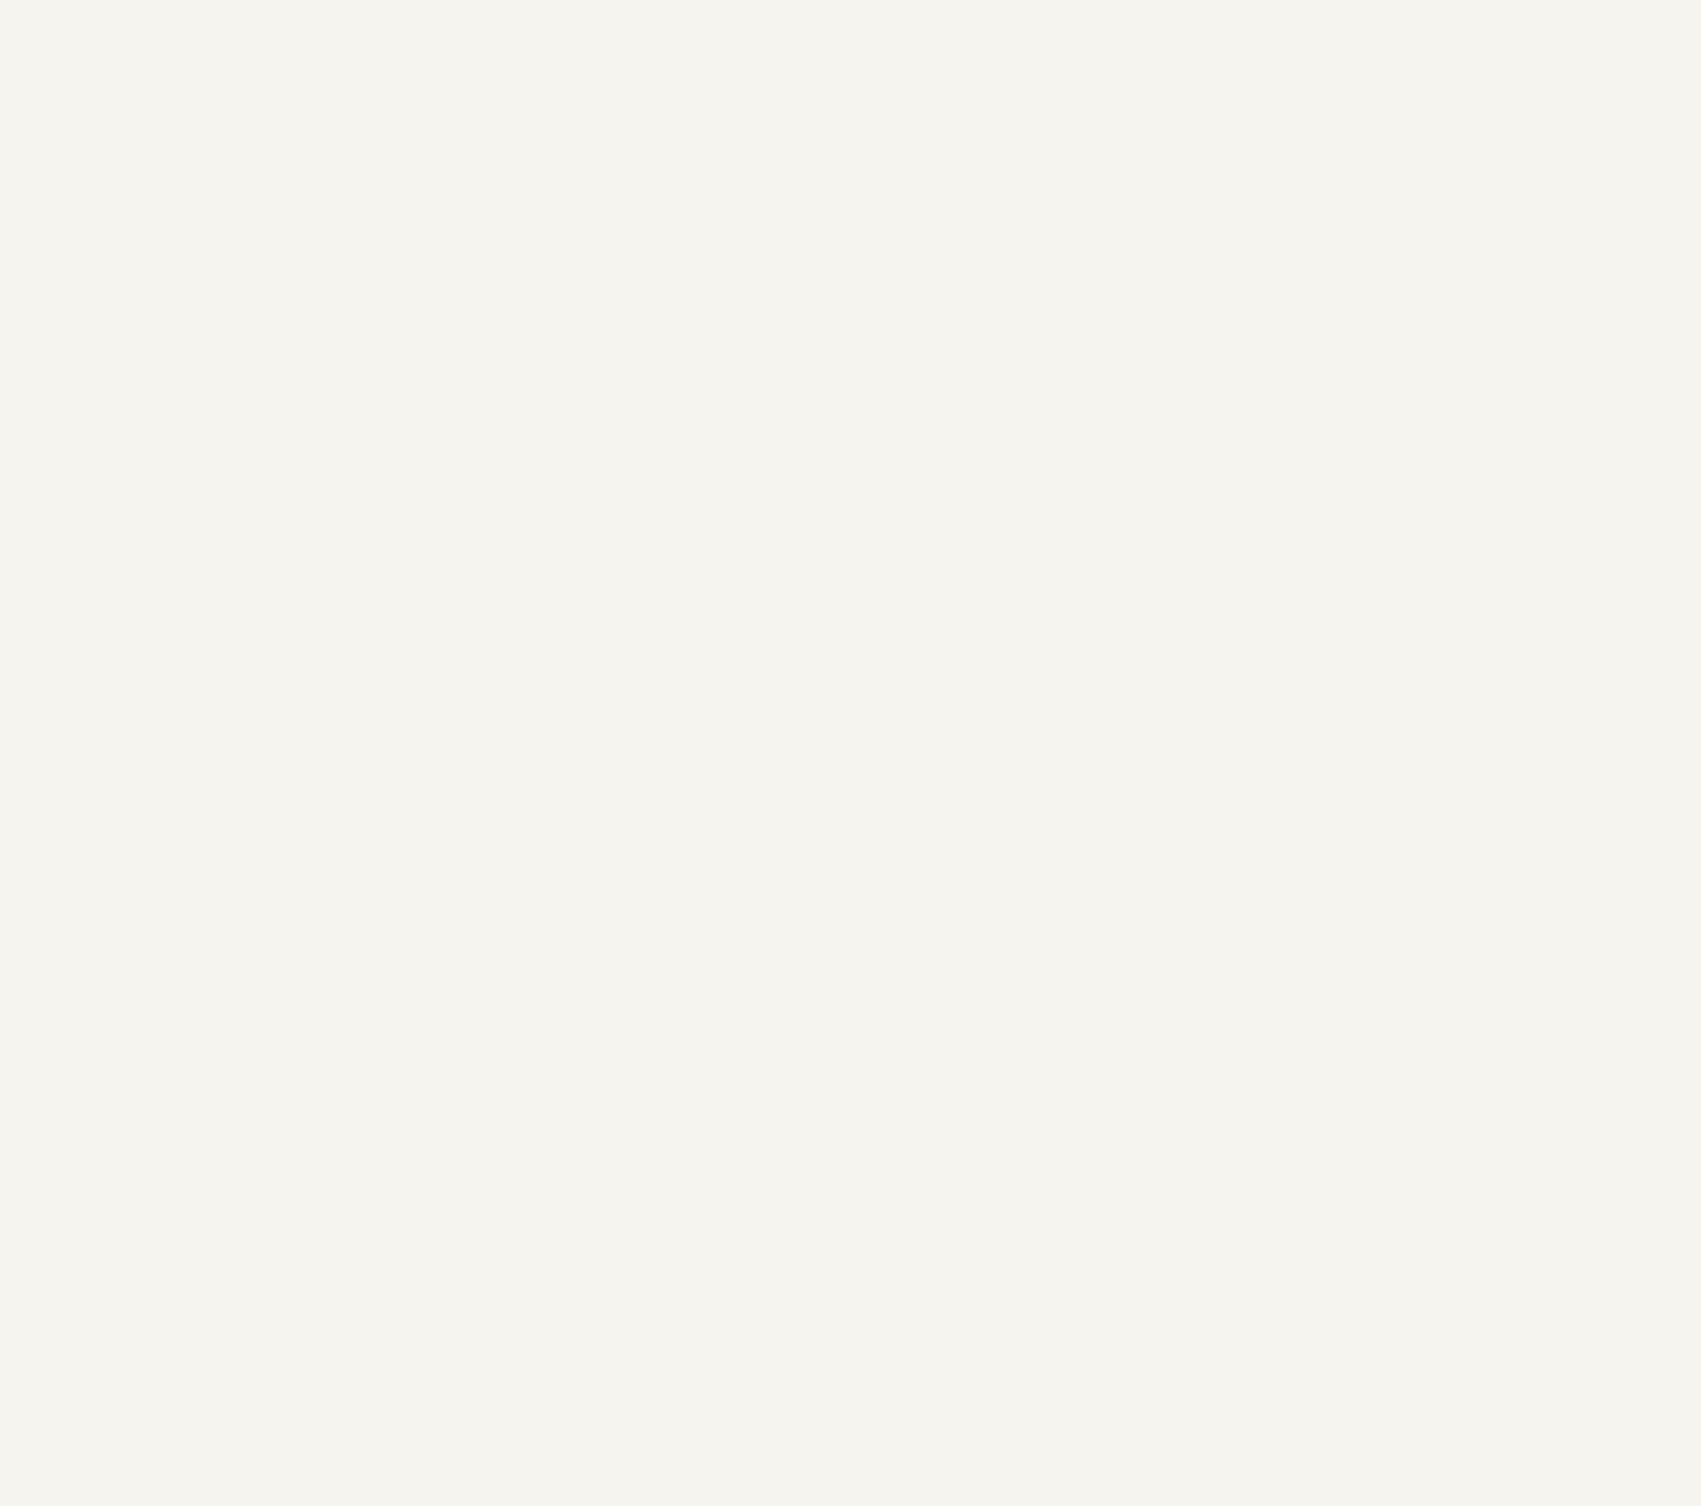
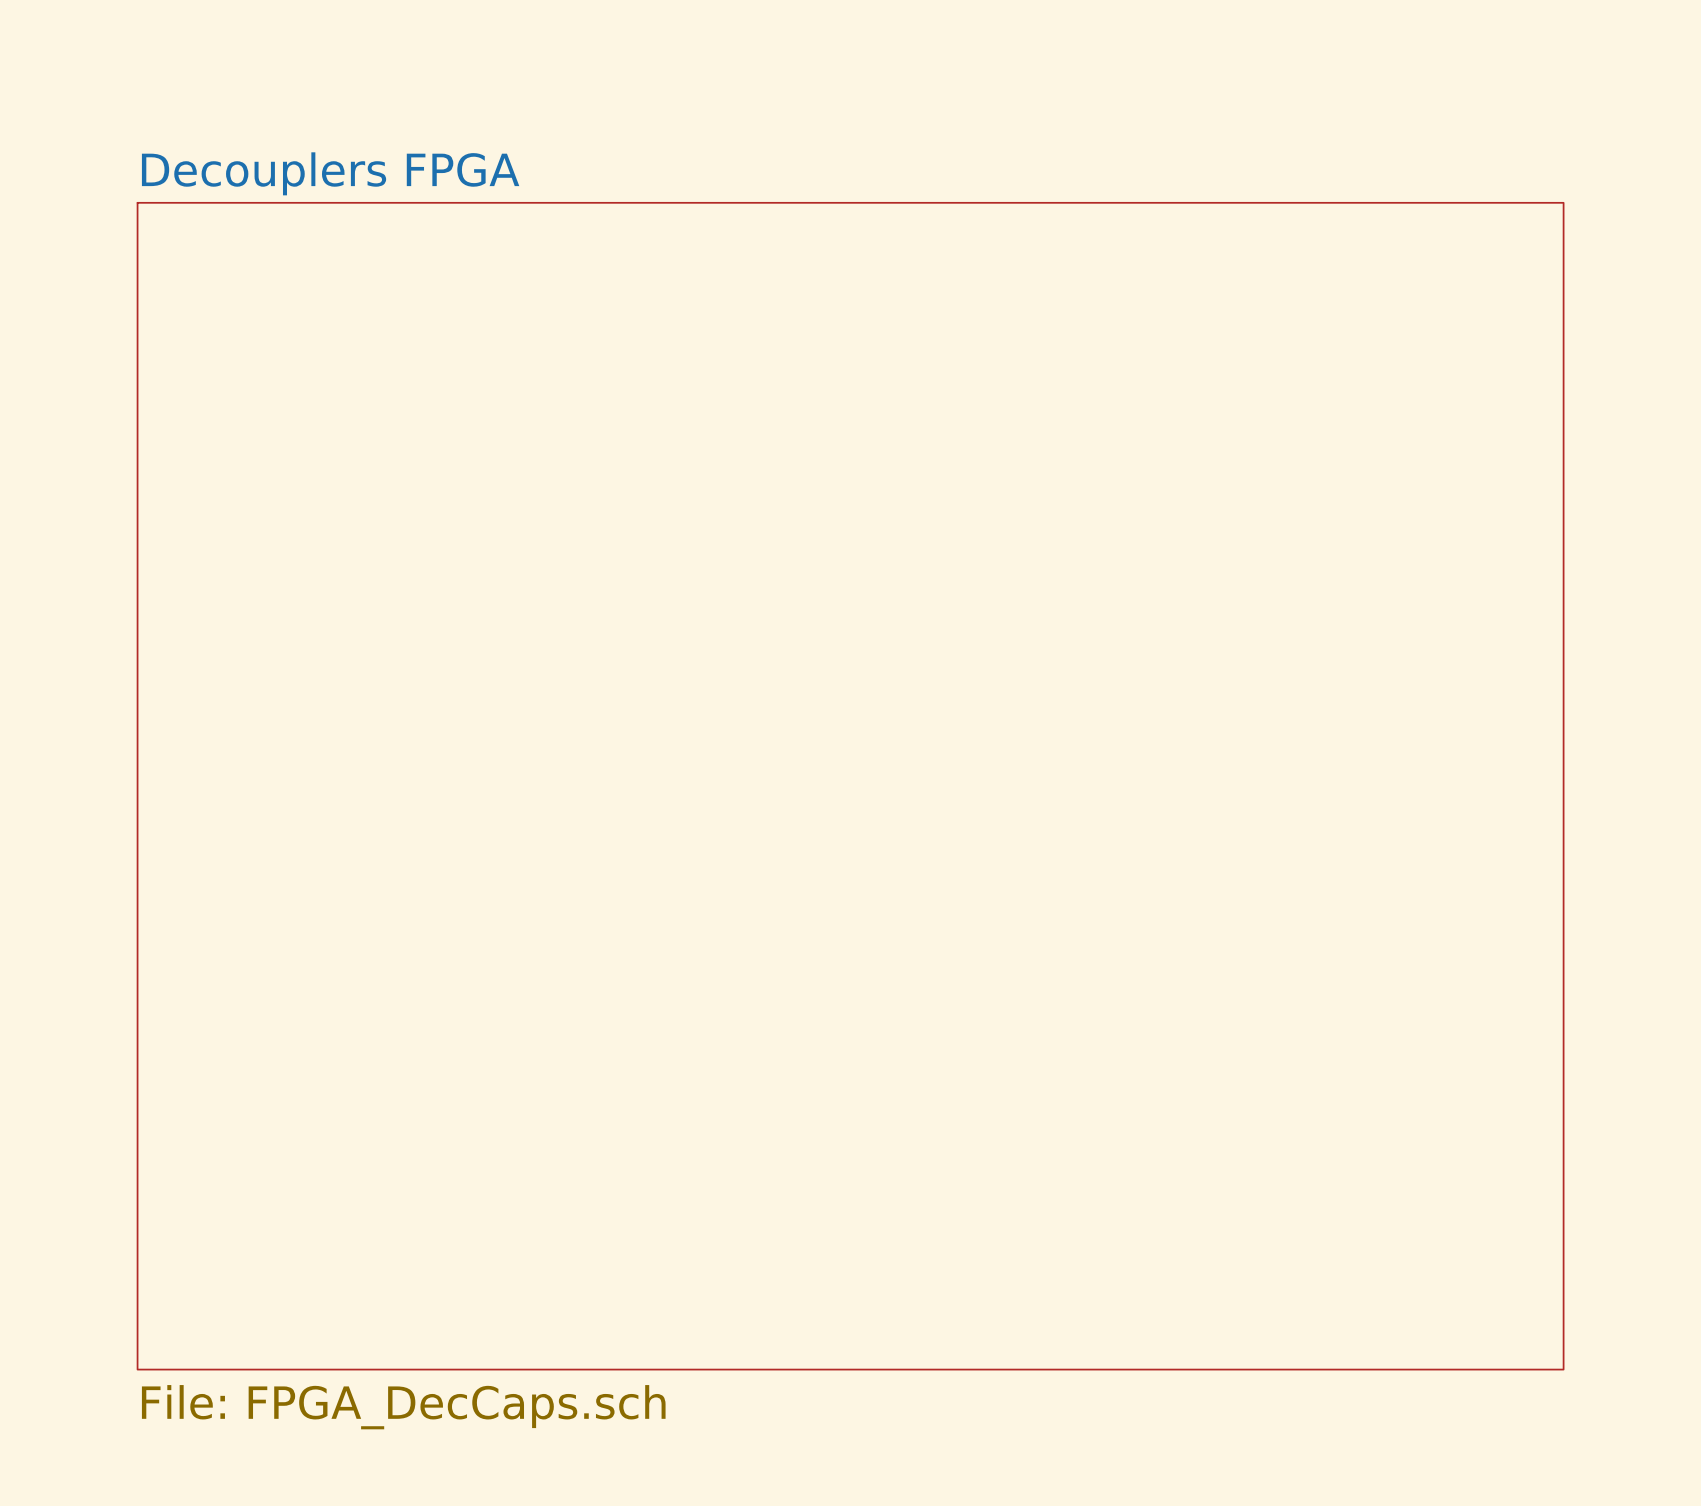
sheet Decouplers FPGA: none -> File: FPGA_DecCaps.sch (850, 786)

